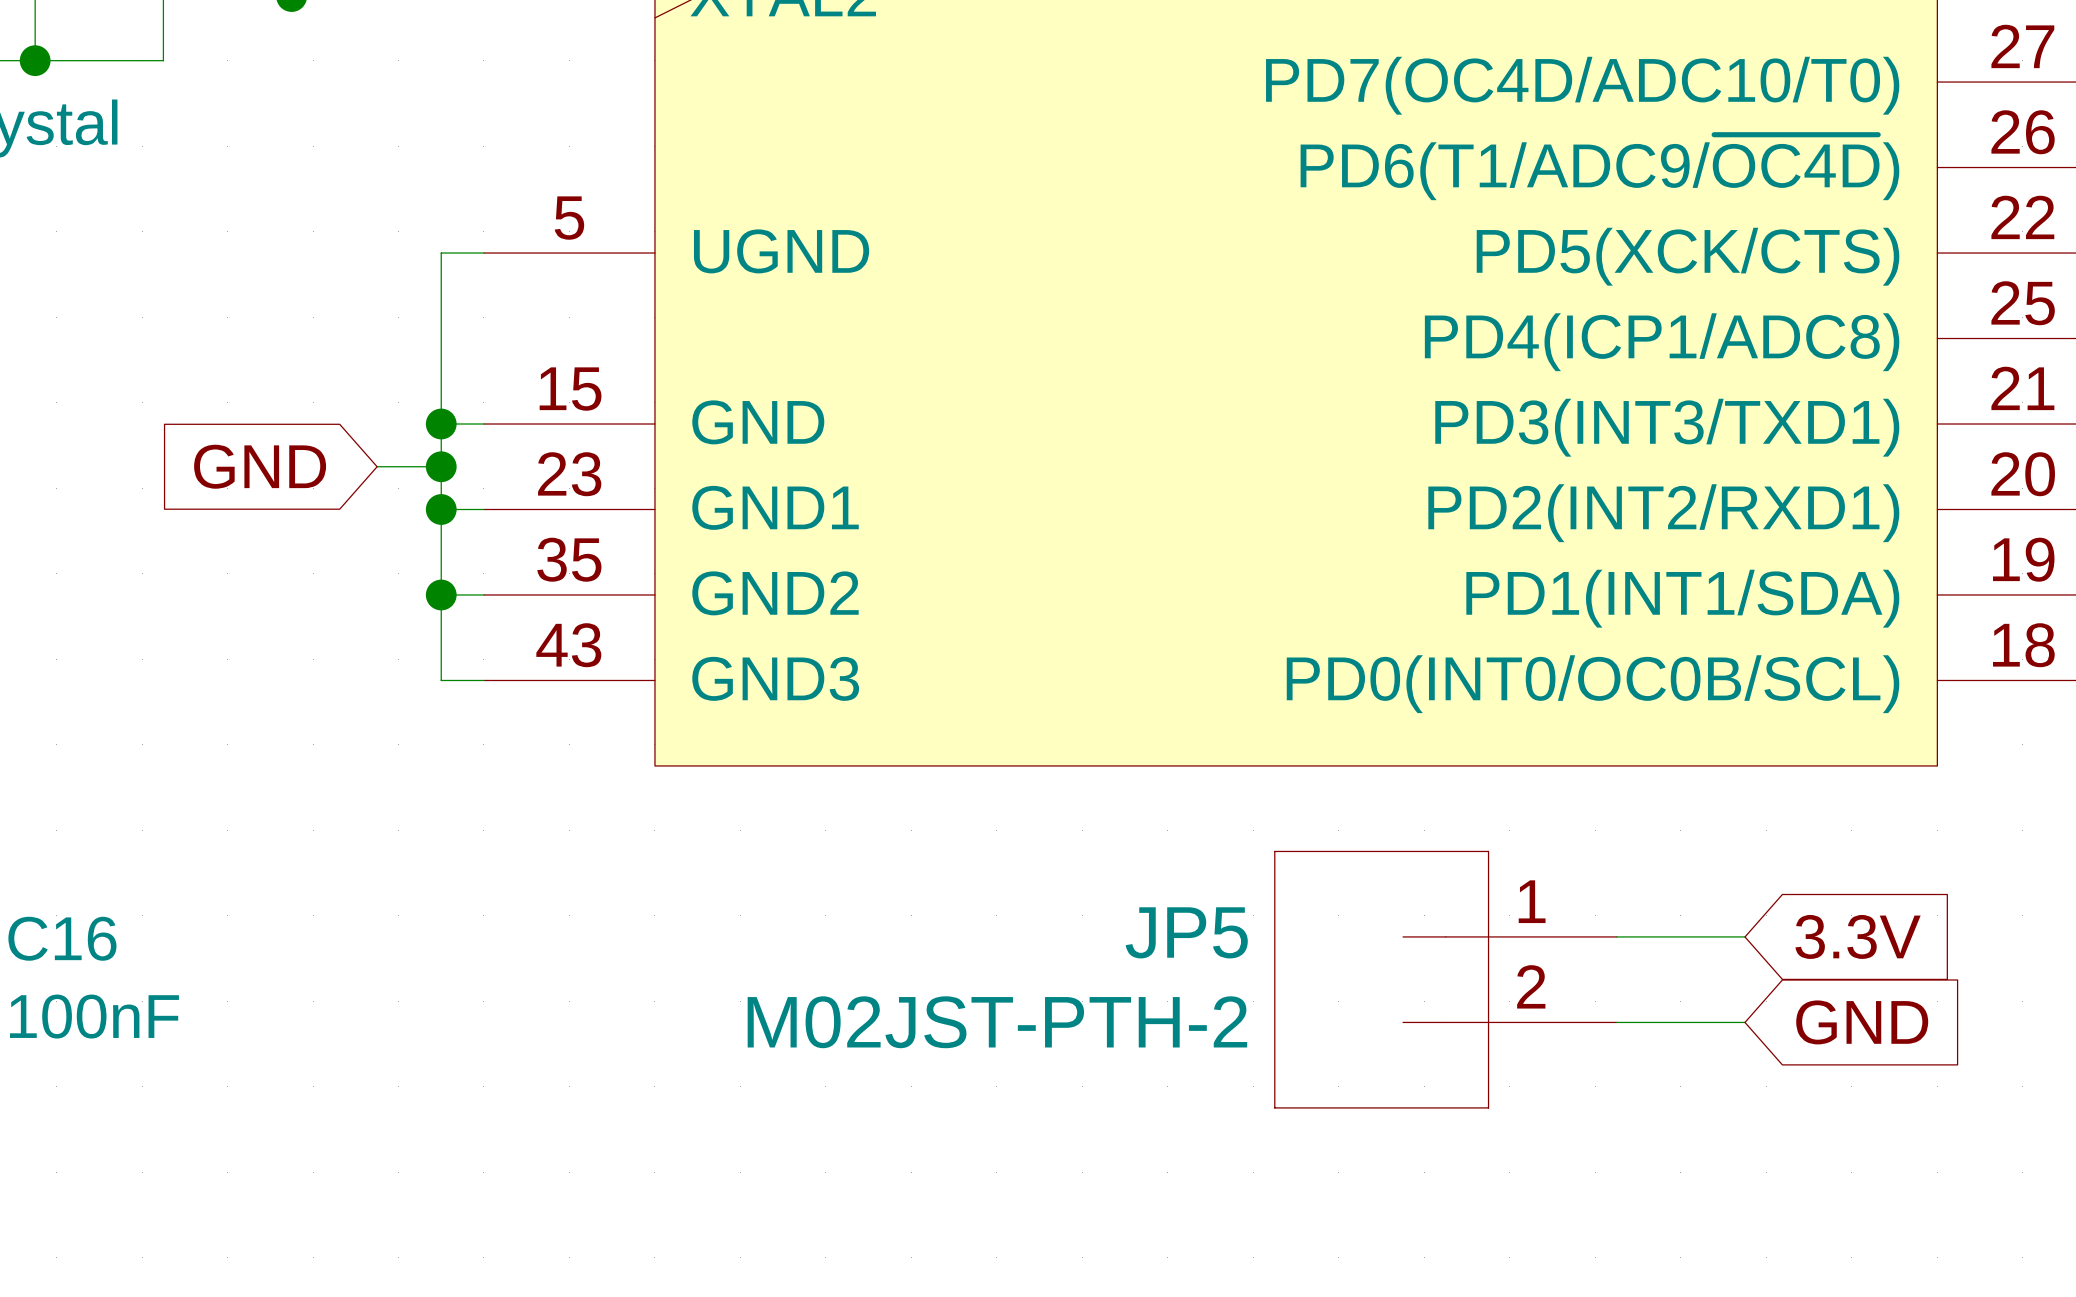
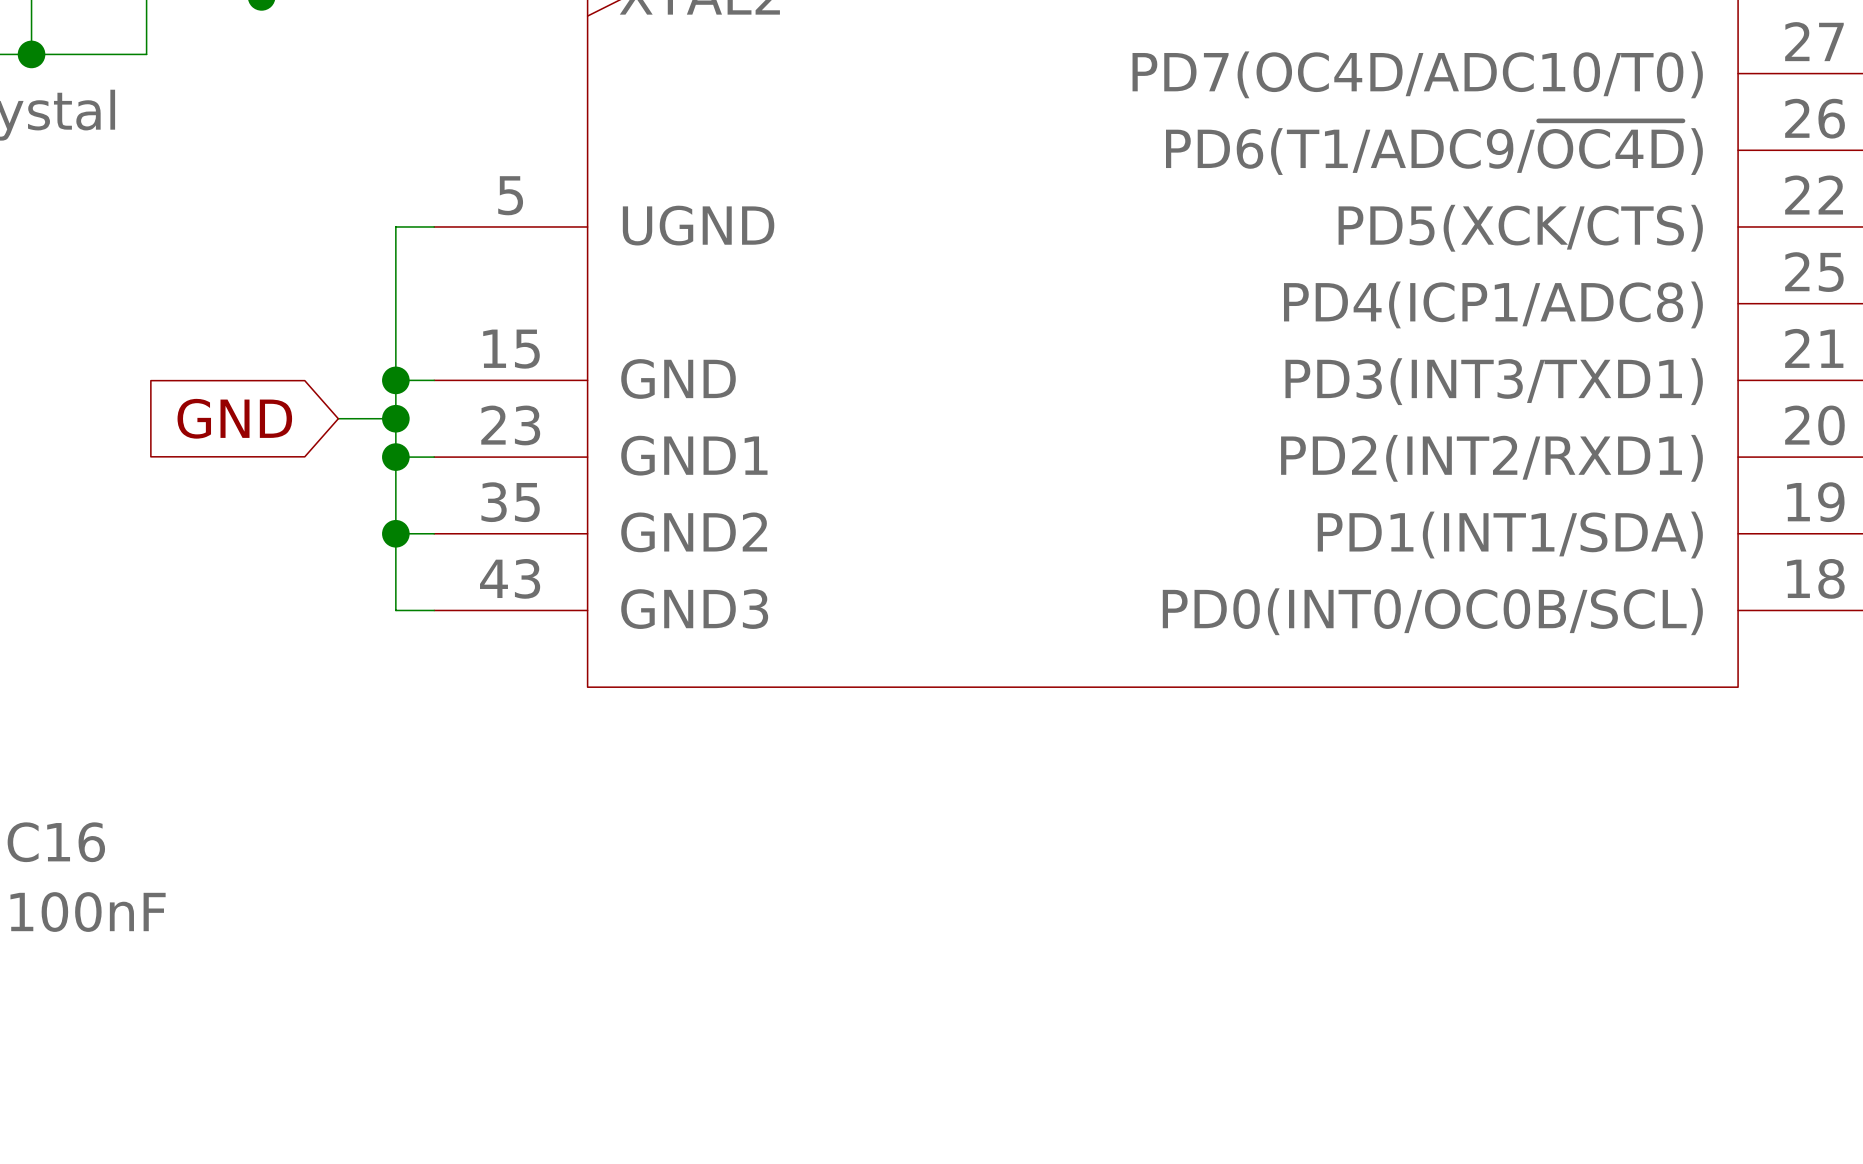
wire: (1616, 936) (1745, 936) -> none
global label: 3.3V (1858, 936) -> none
JP5: M02JST-PTH-2 (1445, 979) -> none
wire: (1616, 1022) (1745, 1022) -> none
global label: GND (1862, 1022) -> none

